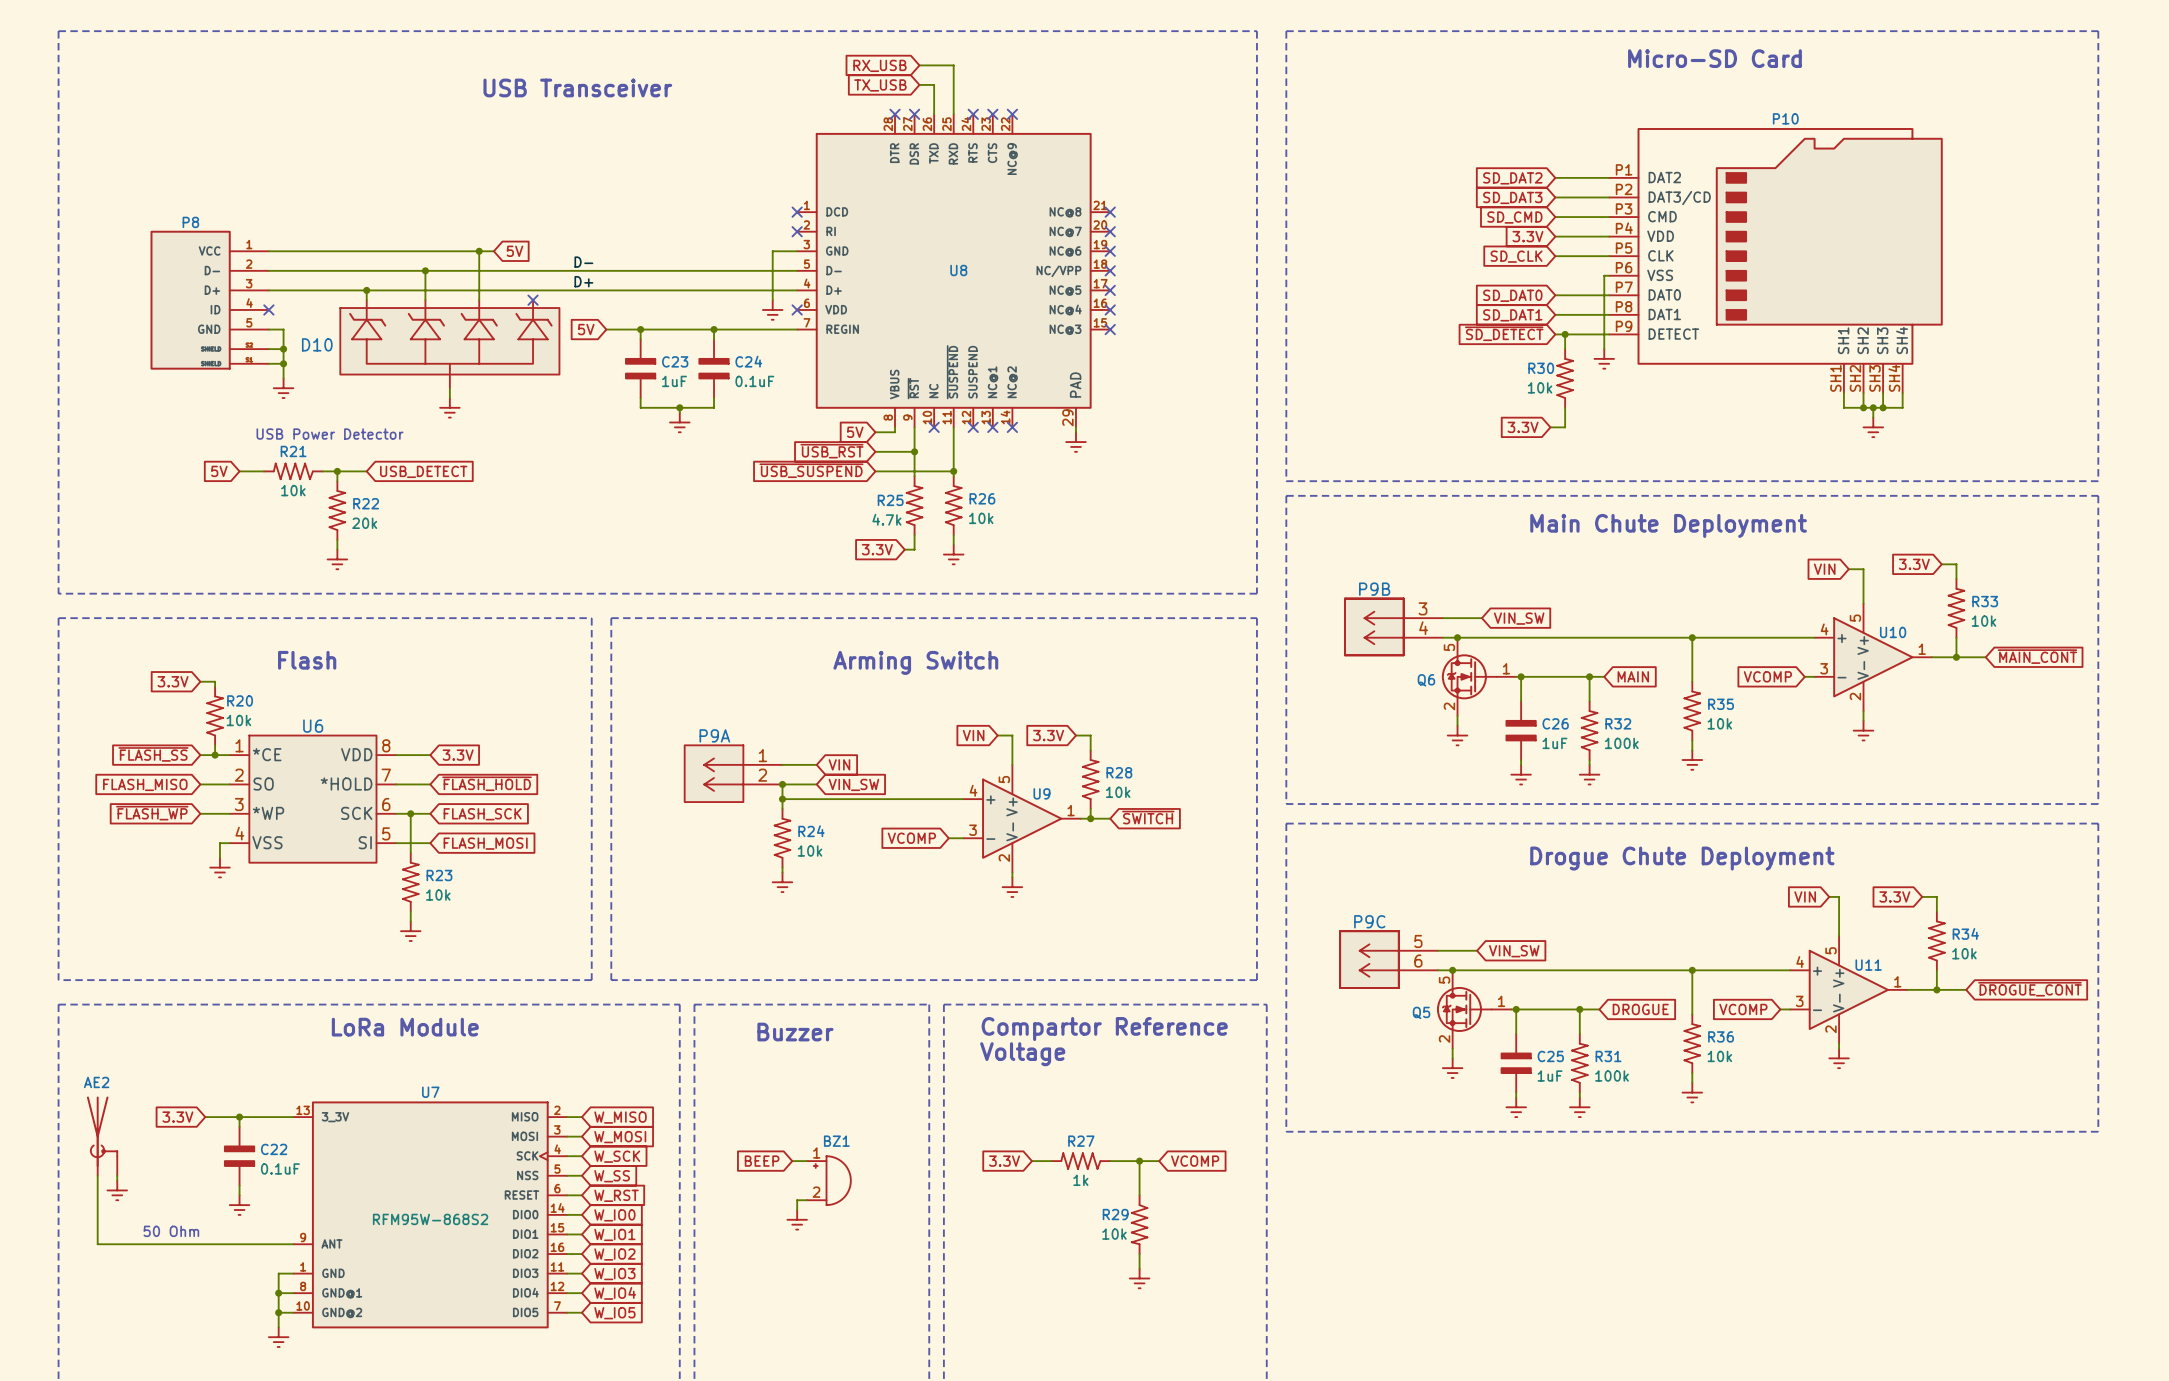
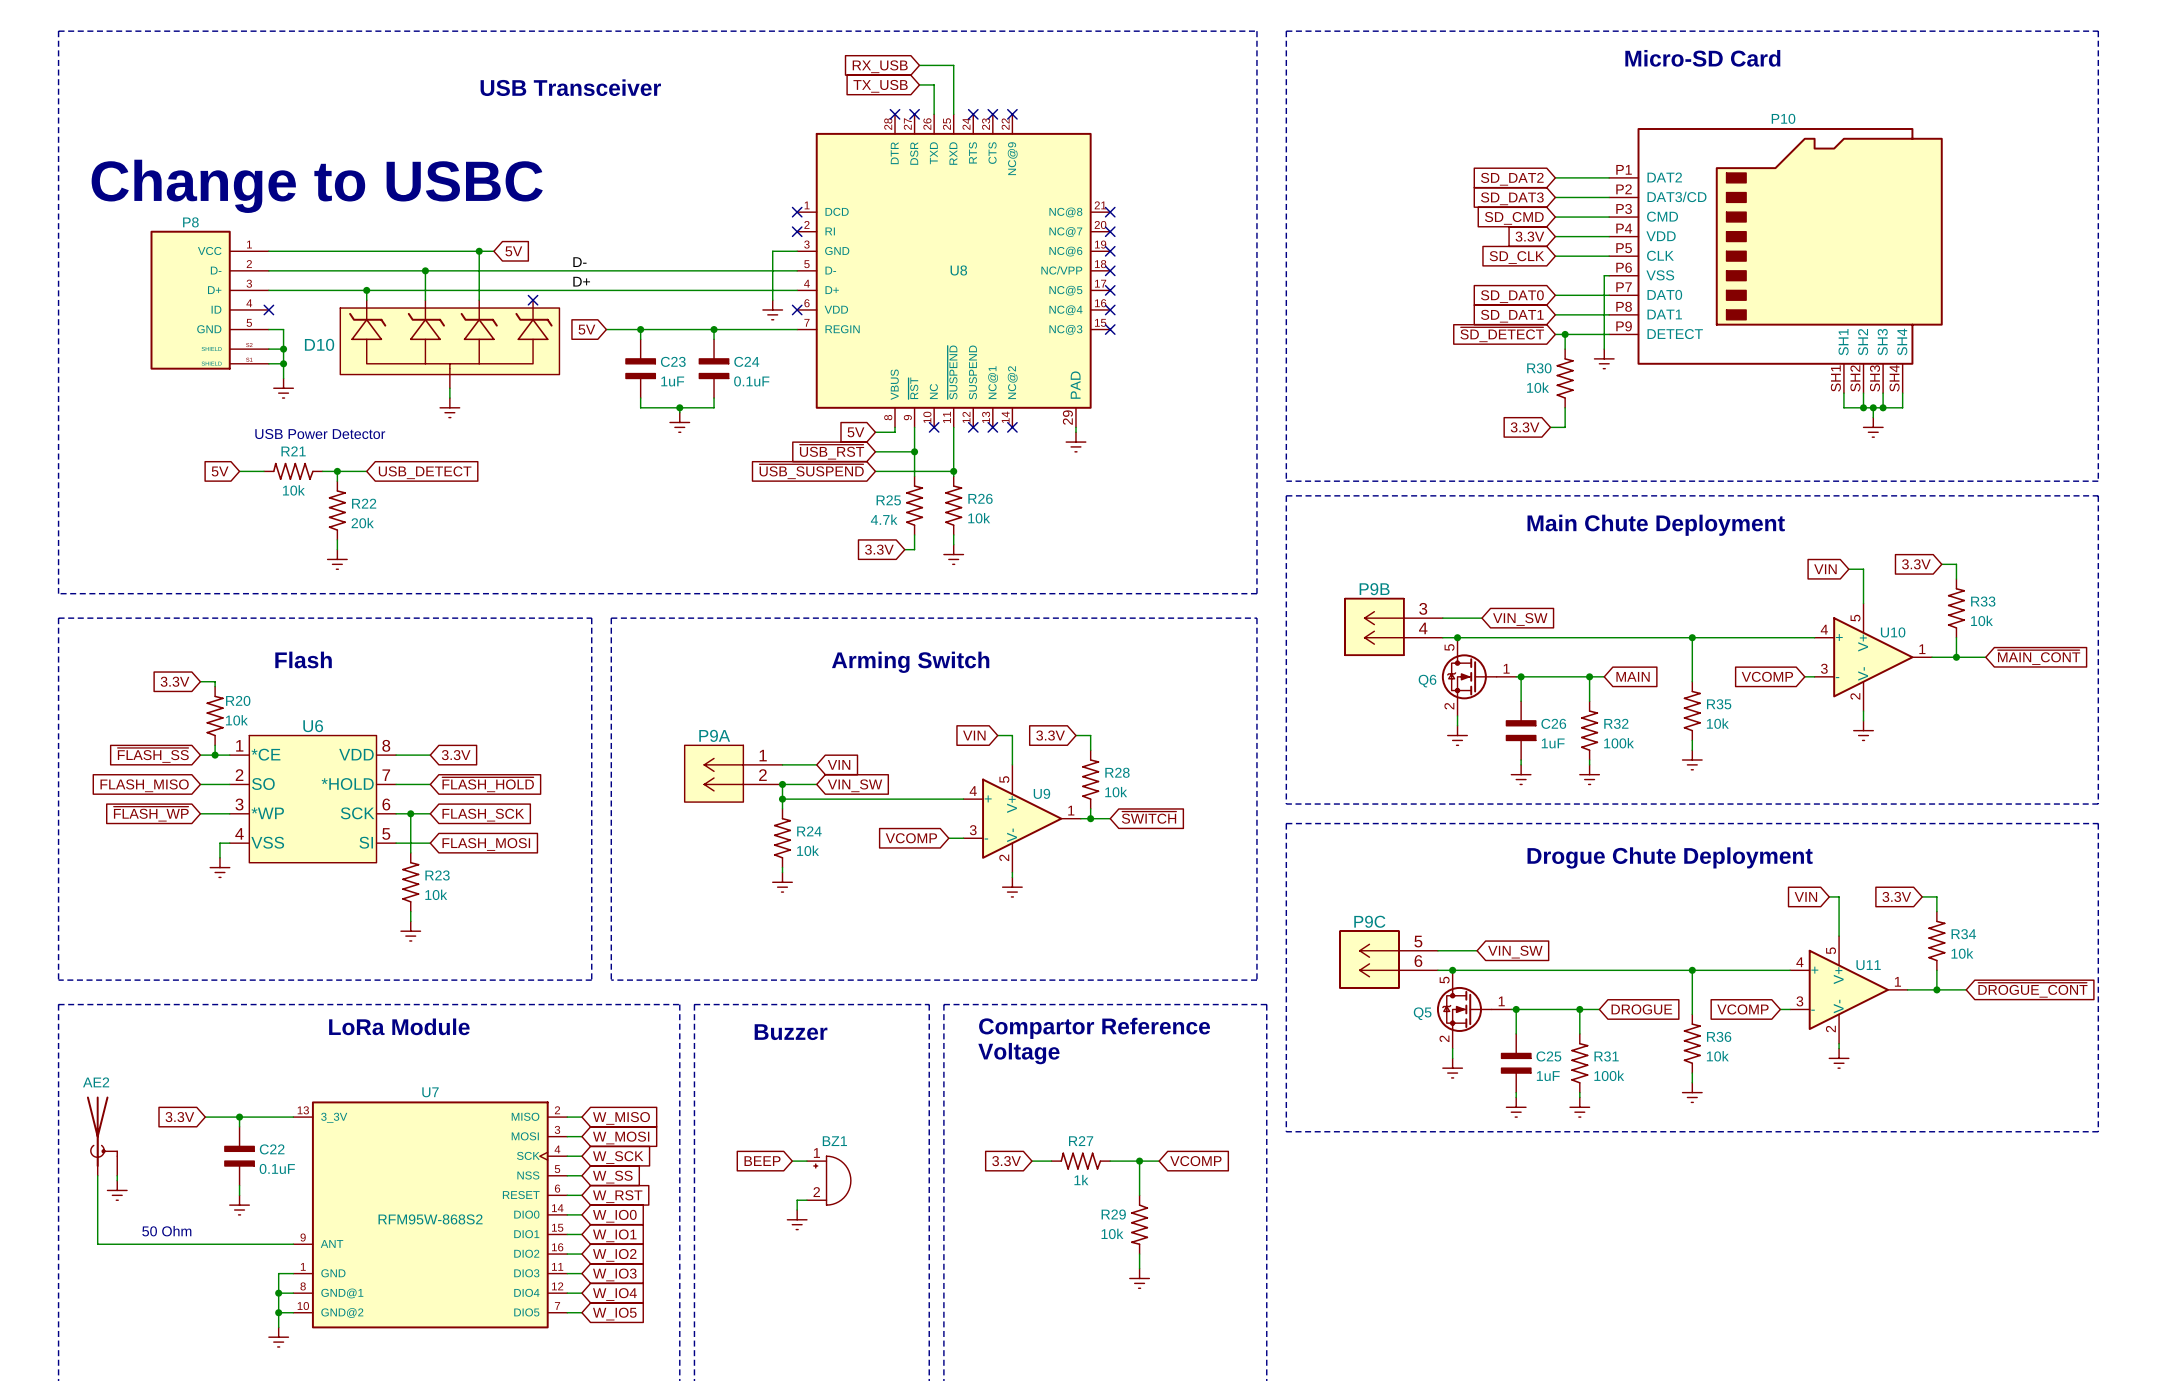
text: none -> Change to USBC (317, 186)

